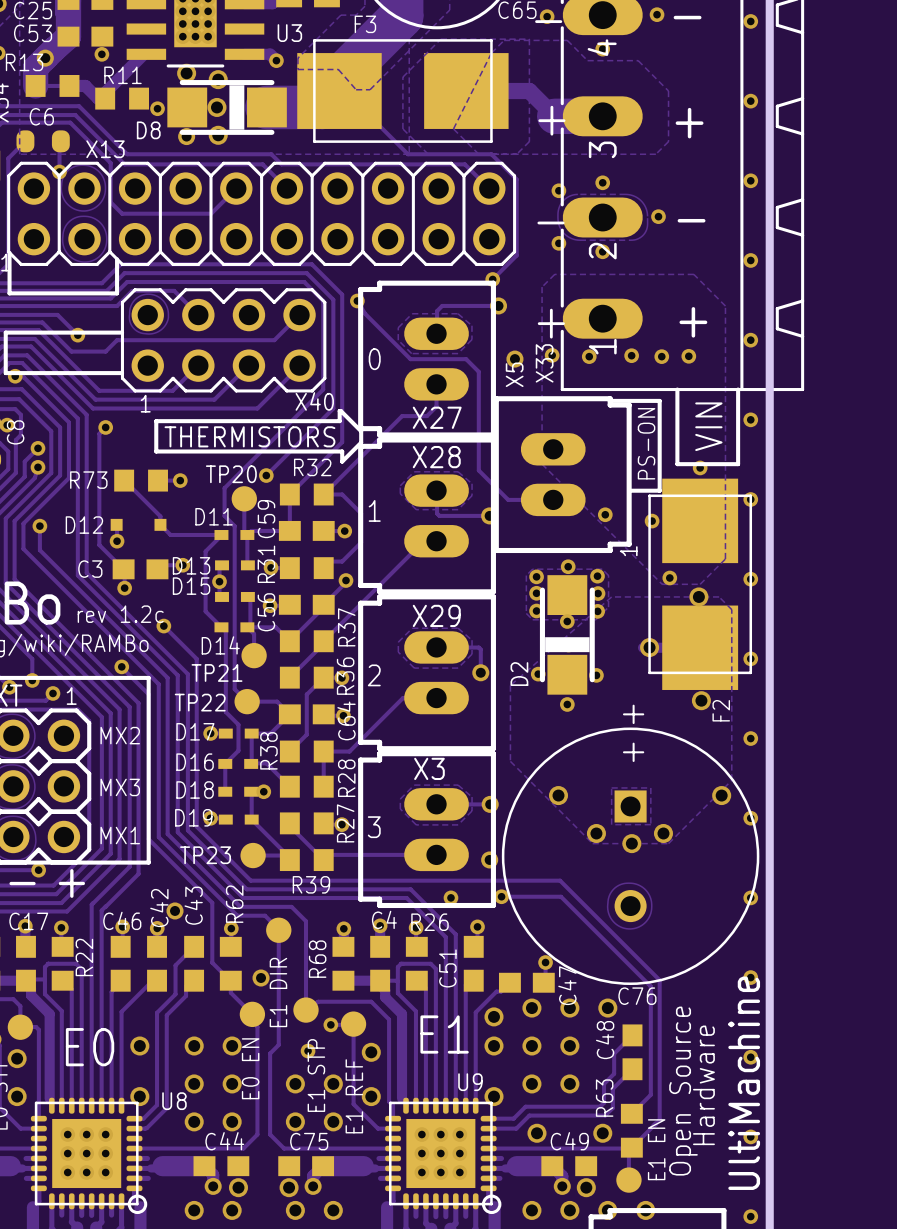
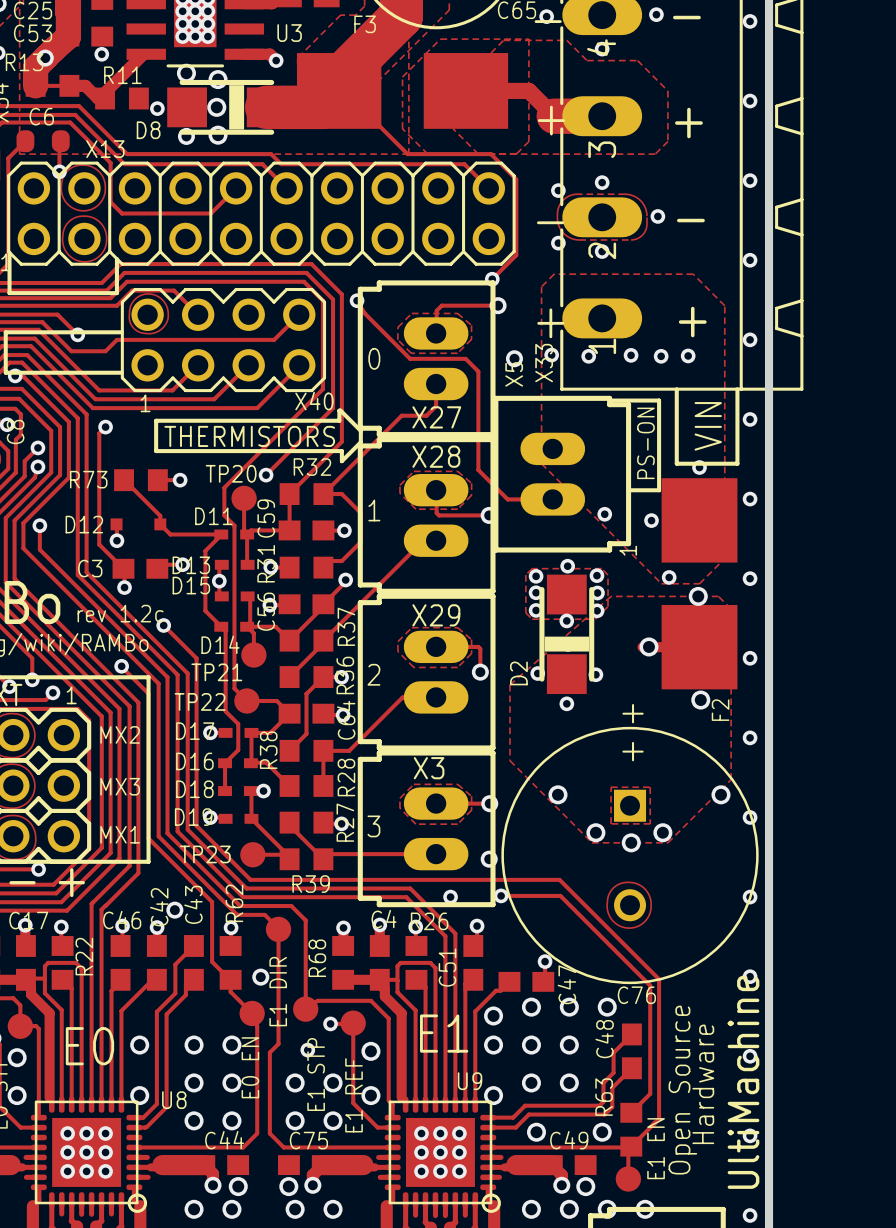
F3 footprint: [297, 39, 509, 143] -> [296, 53, 509, 129]
F2 footprint: [648, 478, 753, 690] -> [661, 478, 738, 690]

